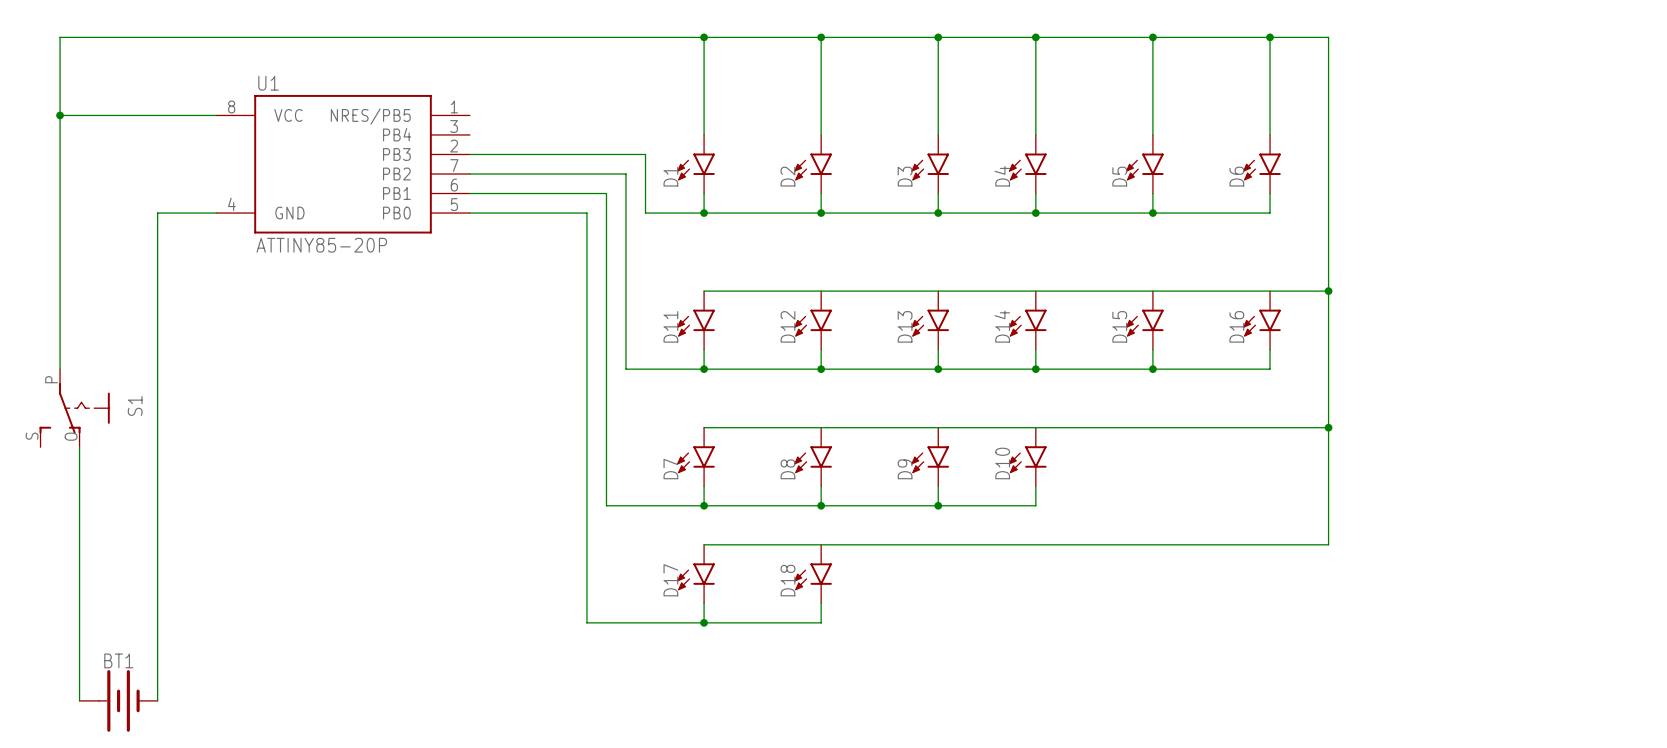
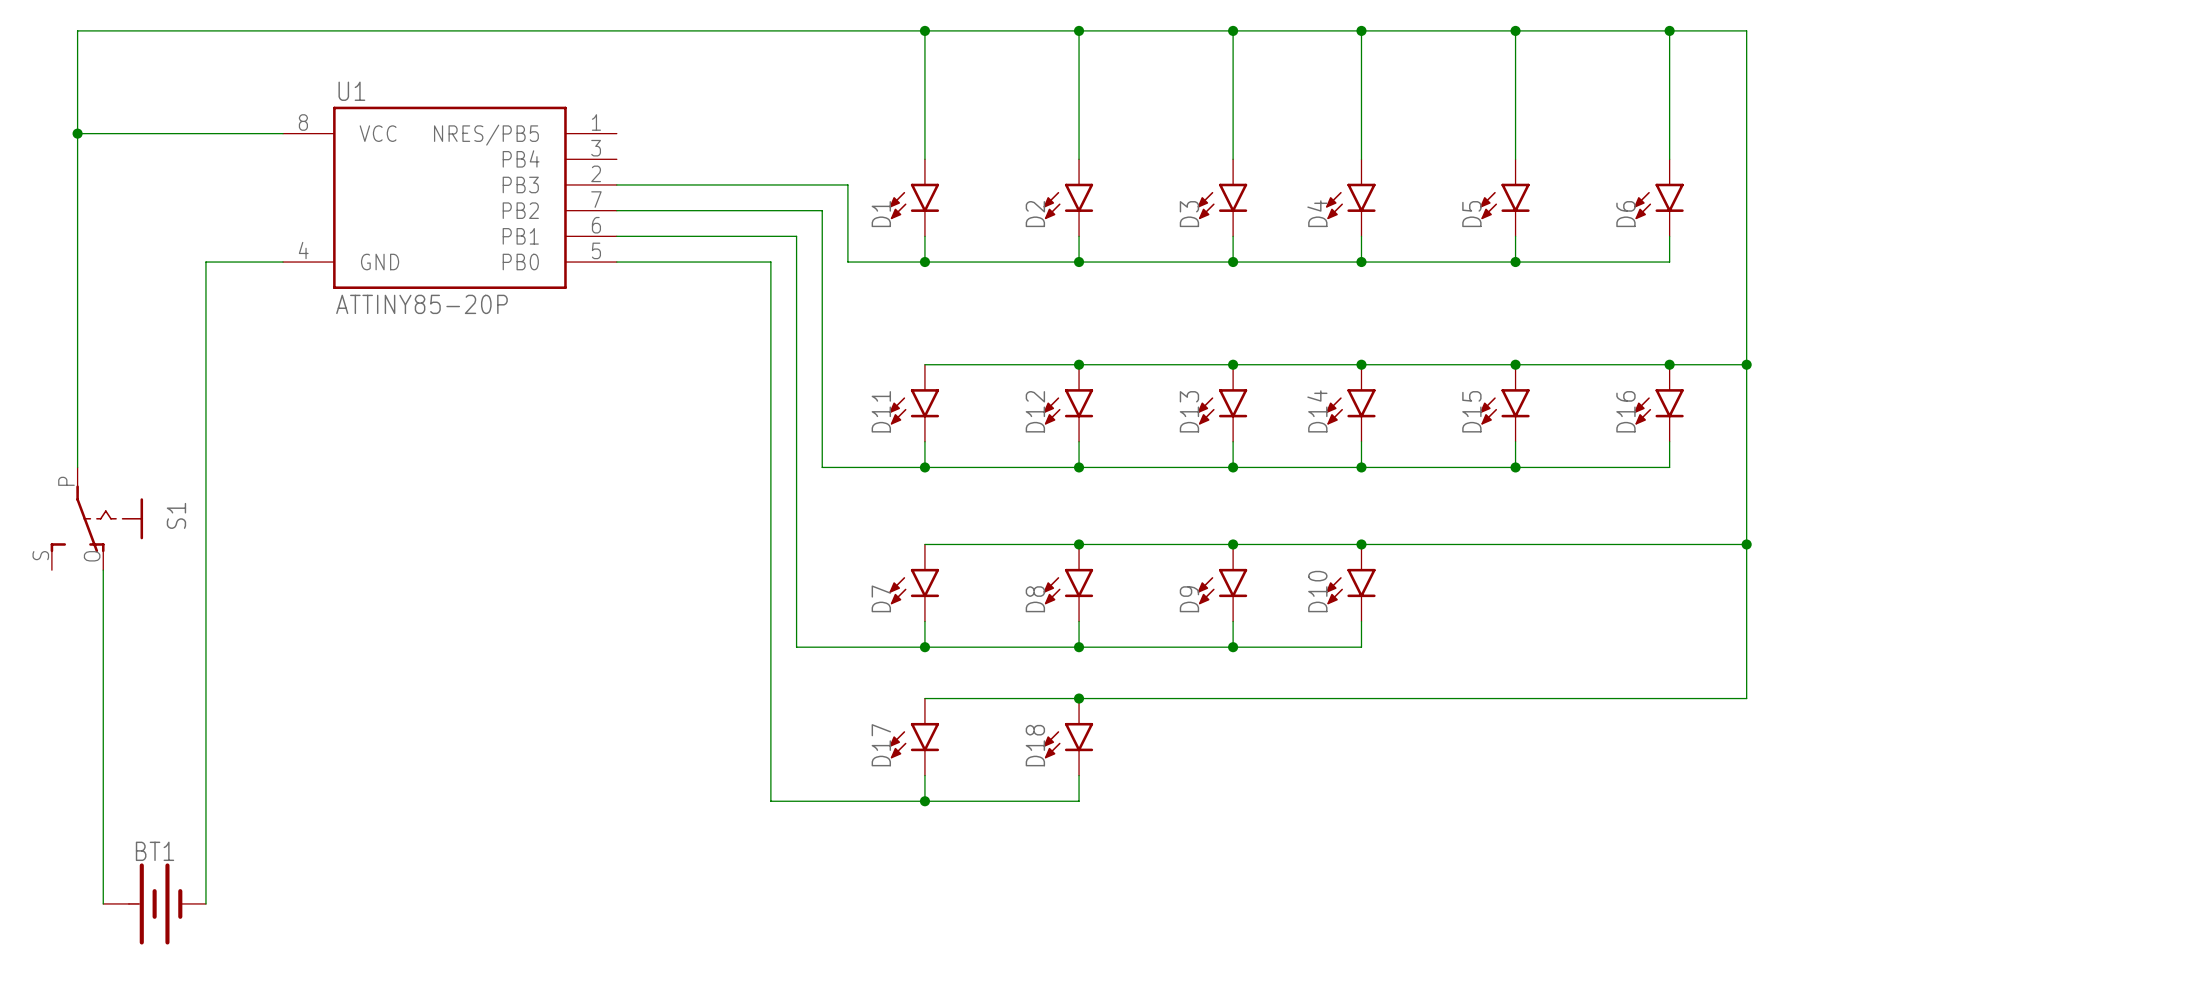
junction: none -> (1079, 364)
junction: none -> (1233, 364)
junction: none -> (1361, 364)
junction: none -> (1515, 364)
junction: none -> (1669, 364)
junction: none -> (1079, 544)
junction: none -> (1233, 544)
junction: none -> (1361, 544)
junction: none -> (1079, 698)

